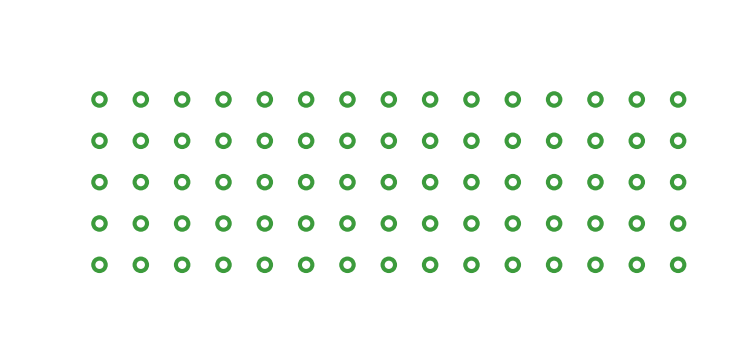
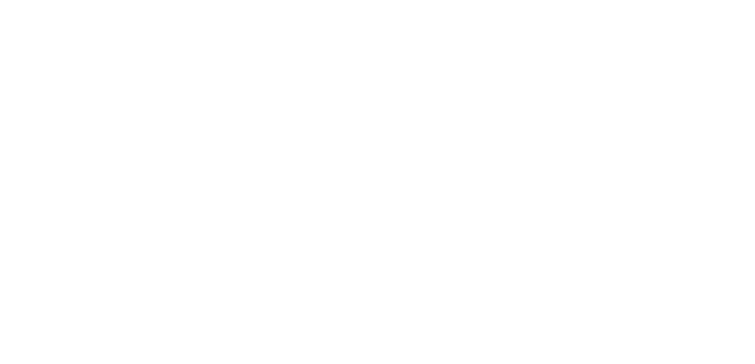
via: (99, 99) -> none
via: (140, 99) -> none
via: (182, 99) -> none
via: (223, 99) -> none
via: (264, 99) -> none
via: (306, 99) -> none
via: (347, 99) -> none
via: (388, 99) -> none
via: (430, 99) -> none
via: (471, 99) -> none
via: (512, 99) -> none
via: (554, 99) -> none
via: (595, 99) -> none
via: (636, 99) -> none
via: (678, 99) -> none
via: (99, 140) -> none
via: (140, 140) -> none
via: (182, 140) -> none
via: (223, 140) -> none
via: (264, 140) -> none
via: (306, 140) -> none
via: (347, 140) -> none
via: (388, 140) -> none
via: (430, 140) -> none
via: (471, 140) -> none
via: (512, 140) -> none
via: (554, 140) -> none
via: (595, 140) -> none
via: (636, 140) -> none
via: (678, 140) -> none
via: (99, 182) -> none
via: (140, 182) -> none
via: (182, 182) -> none
via: (223, 182) -> none
via: (264, 182) -> none
via: (306, 182) -> none
via: (347, 182) -> none
via: (388, 182) -> none
via: (430, 182) -> none
via: (471, 182) -> none
via: (512, 182) -> none
via: (554, 182) -> none
via: (595, 182) -> none
via: (636, 182) -> none
via: (678, 182) -> none
via: (99, 223) -> none
via: (140, 223) -> none
via: (182, 223) -> none
via: (223, 223) -> none
via: (264, 223) -> none
via: (306, 223) -> none
via: (347, 223) -> none
via: (388, 223) -> none
via: (430, 223) -> none
via: (471, 223) -> none
via: (512, 223) -> none
via: (554, 223) -> none
via: (595, 223) -> none
via: (636, 223) -> none
via: (678, 223) -> none
via: (99, 264) -> none
via: (140, 264) -> none
via: (182, 264) -> none
via: (223, 264) -> none
via: (264, 264) -> none
via: (306, 264) -> none
via: (347, 264) -> none
via: (388, 264) -> none
via: (430, 264) -> none
via: (471, 264) -> none
via: (512, 264) -> none
via: (554, 264) -> none
via: (595, 264) -> none
via: (636, 264) -> none
via: (678, 264) -> none

